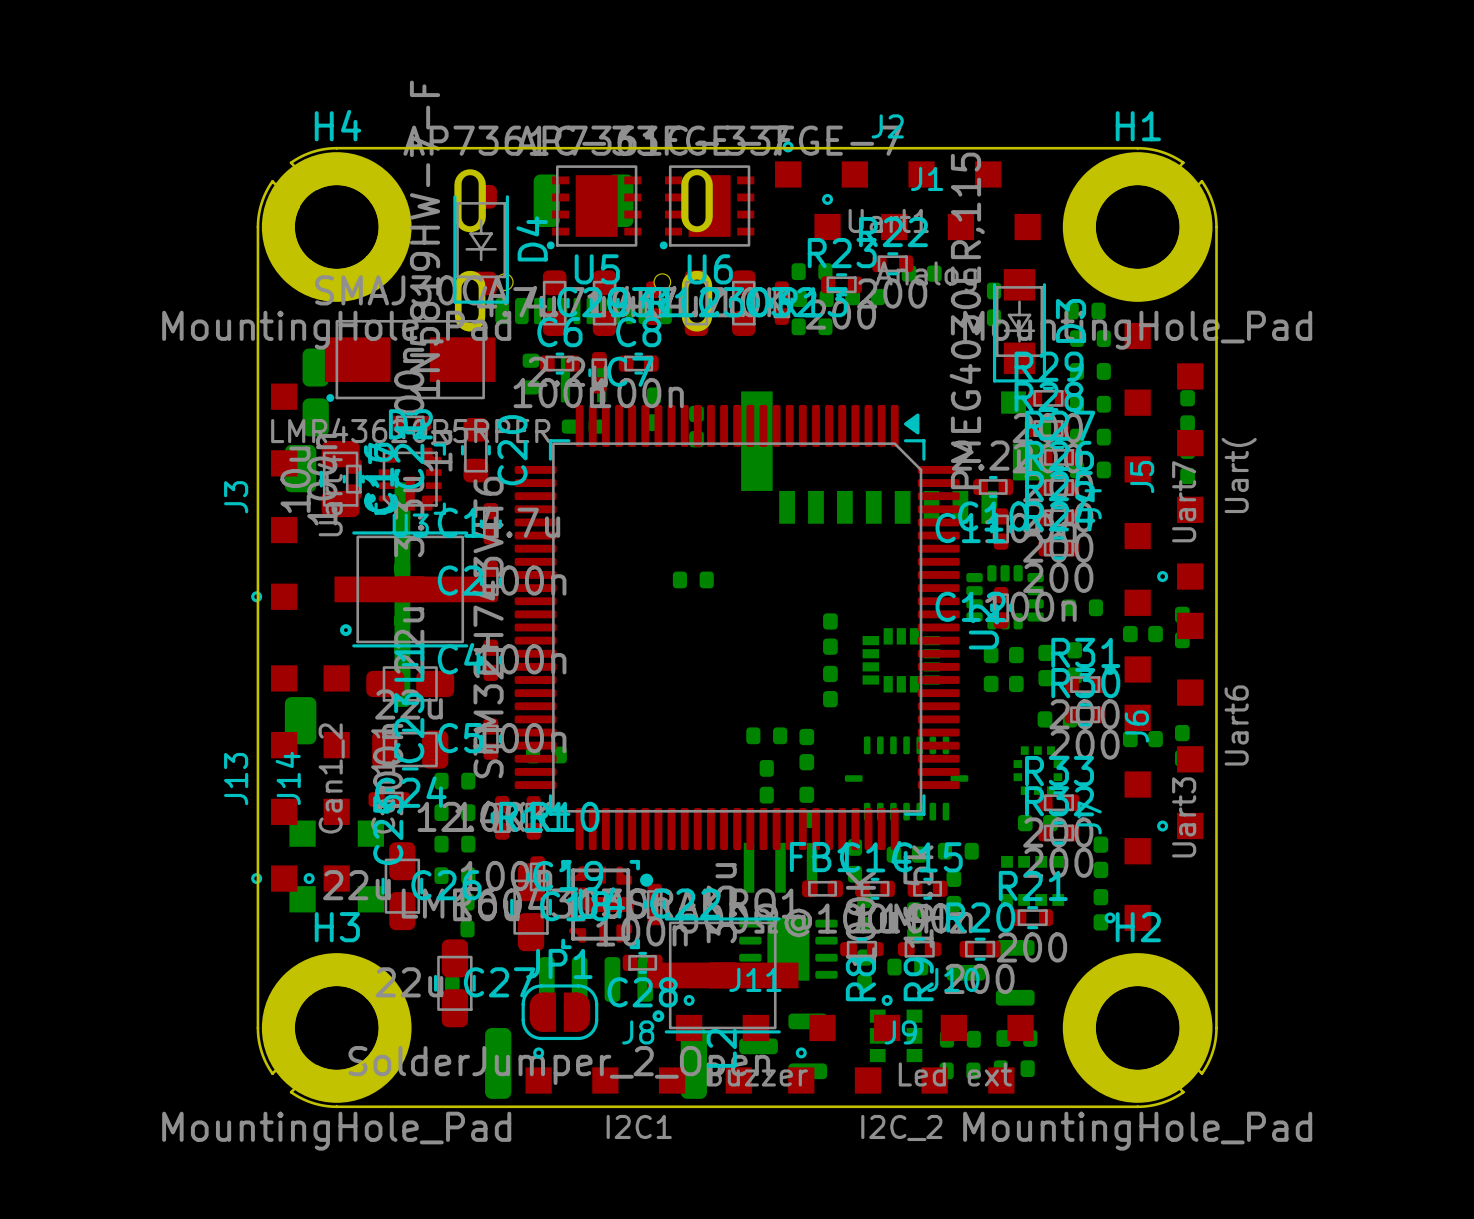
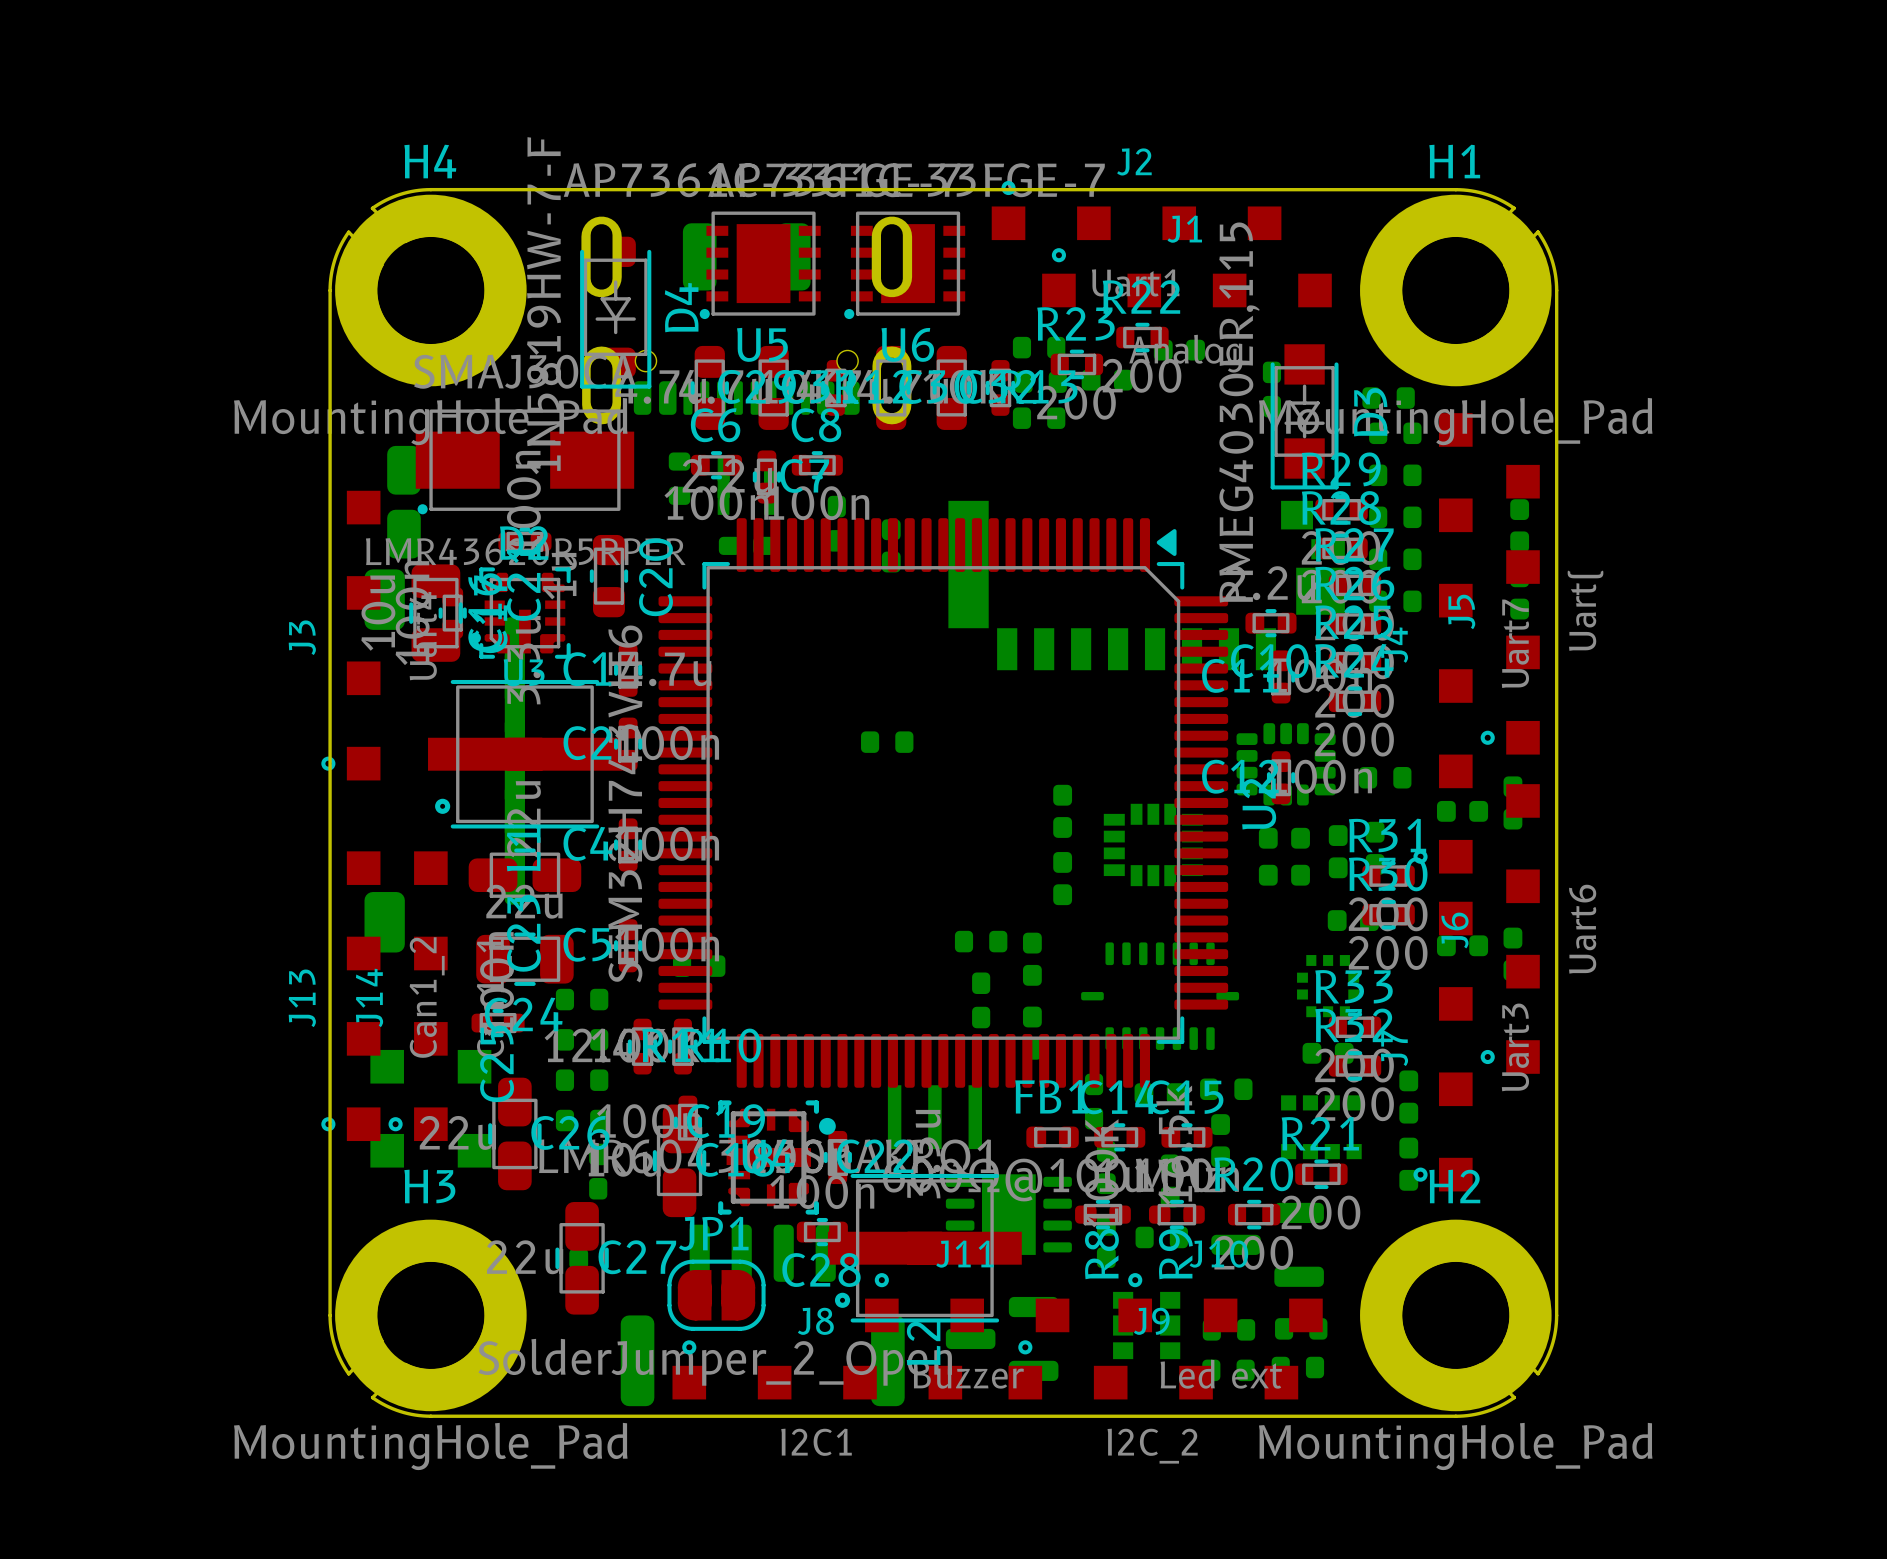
part position: (780, 867) -> (934, 1117)

